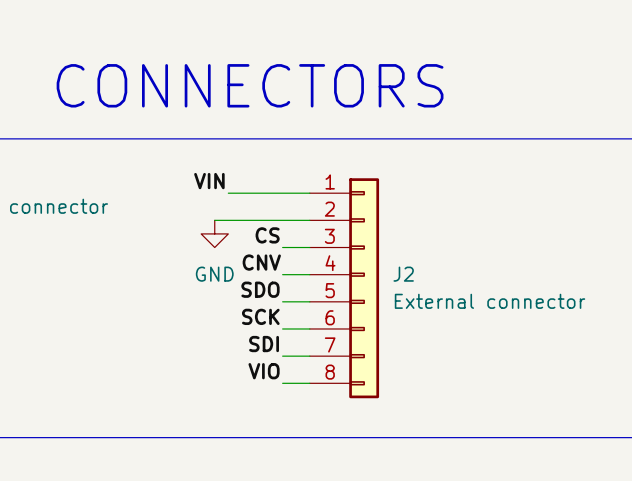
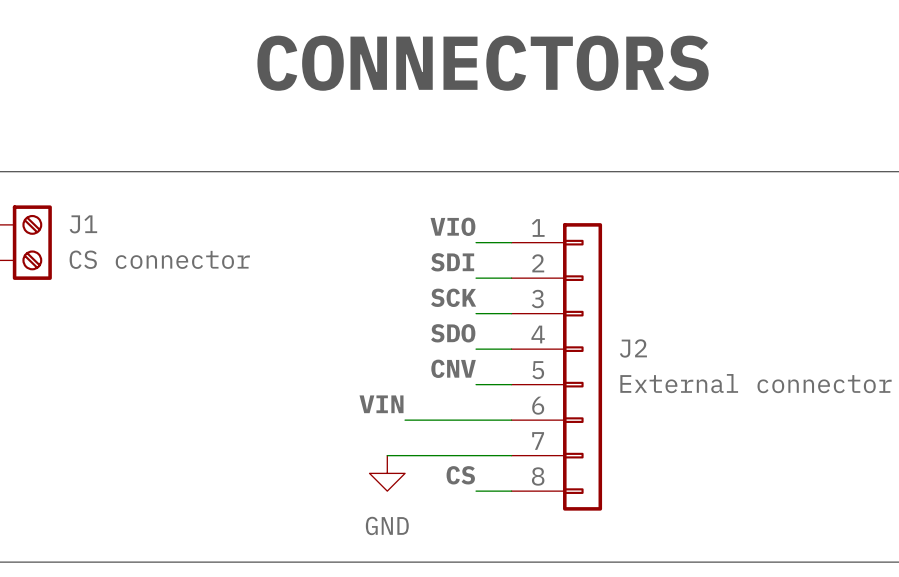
text position: CONNECTORS (250, 85) -> CONNECTORS (483, 63)
label position: VIN (209, 181) -> VIN (381, 404)
label: none -> VIO (452, 226)
wire: (228, 193) (282, 193) -> (405, 420) (476, 420)
wire: (214, 220) (282, 220) -> (387, 455) (476, 455)
power symbol position: GND (214, 233) -> GND (387, 473)
label: CS (267, 235) -> SCK (453, 297)
label: CNV (261, 262) -> SDO (453, 333)
label: SDO (260, 289) -> CNV (453, 368)
label: SCK (260, 316) -> none
label position: SDI (264, 344) -> SDI (452, 262)
label: VIO (264, 371) -> CS (460, 475)

